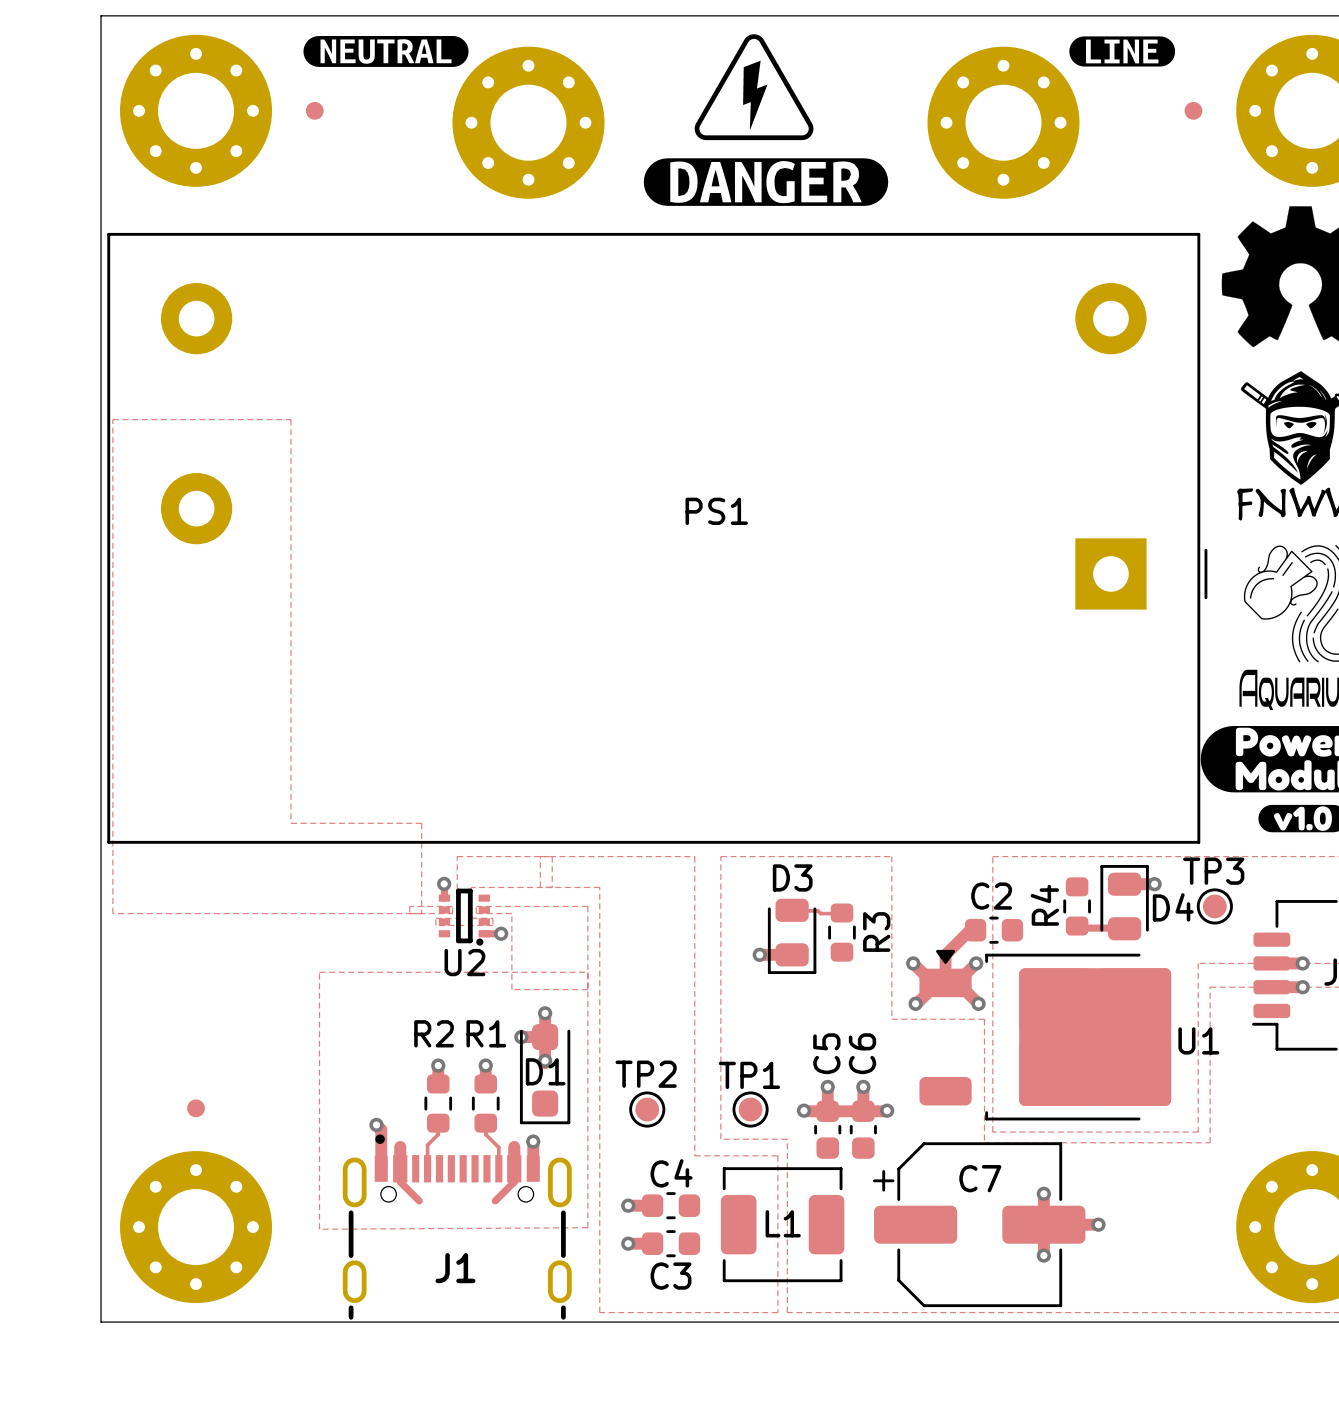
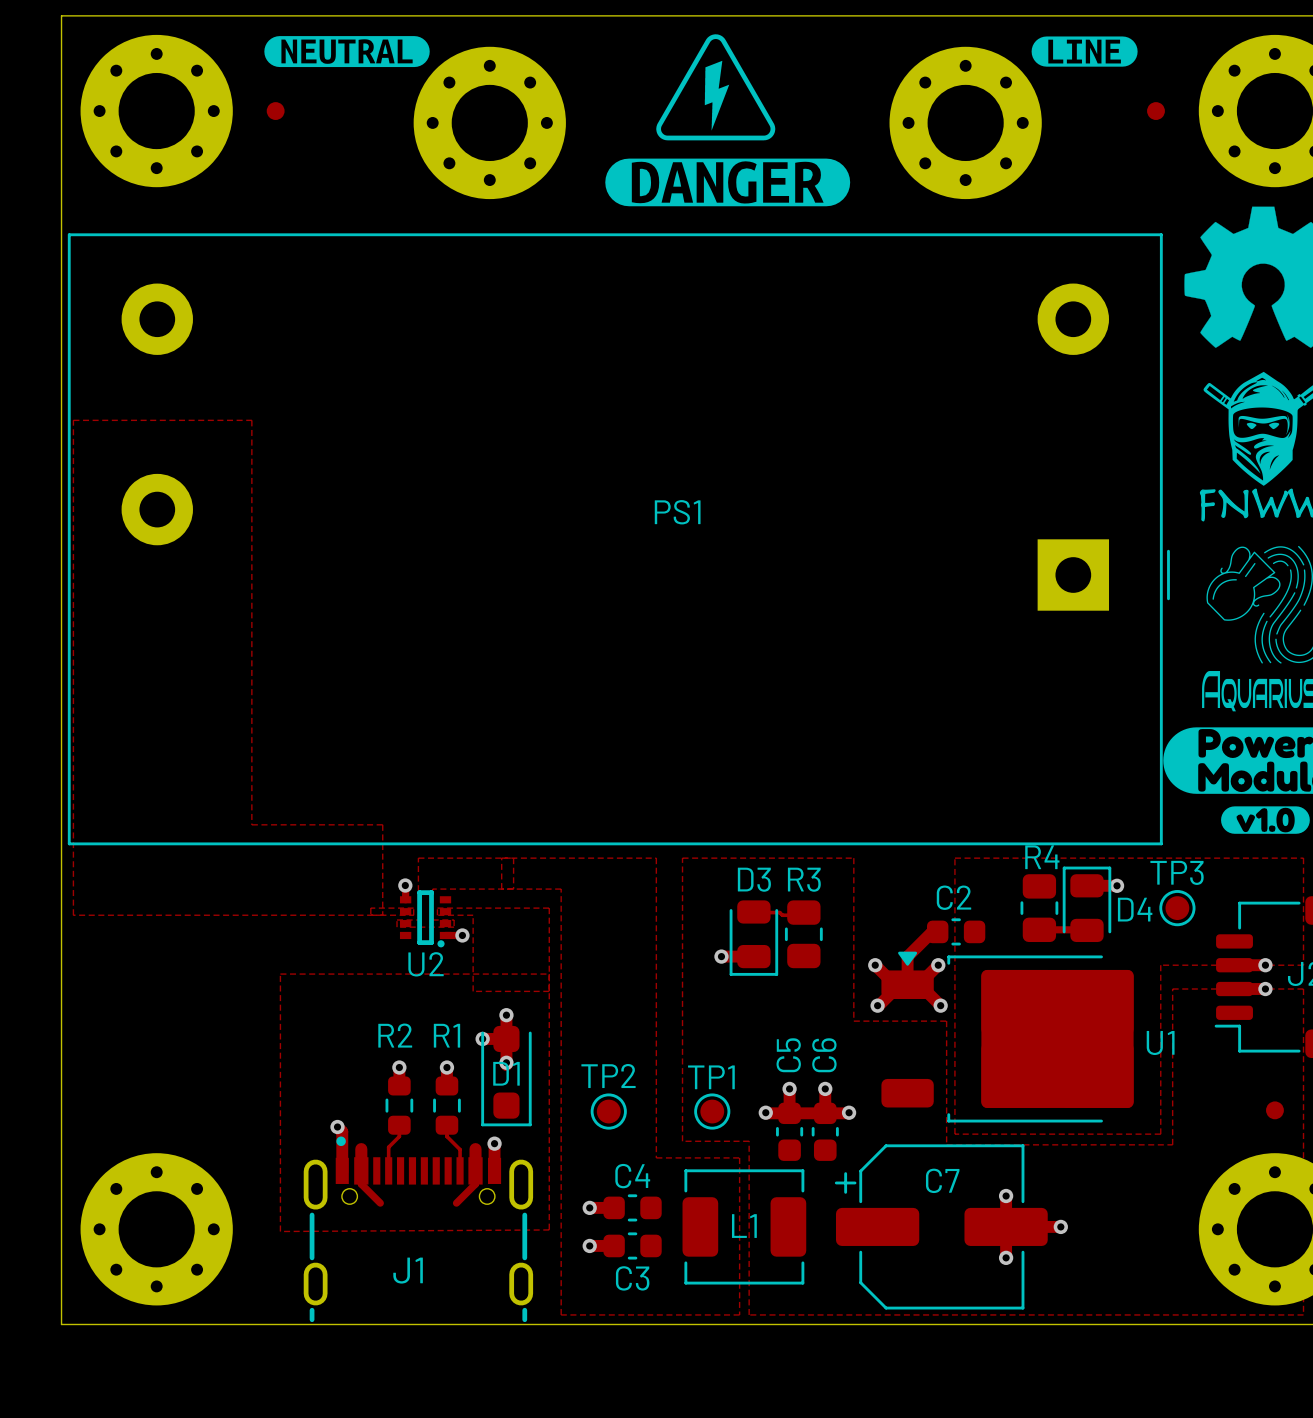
R4 footprint: [1063, 877, 1091, 936] -> [1020, 874, 1059, 943]
R3 footprint: [828, 903, 856, 962] -> [784, 900, 823, 969]
R4 name rotation: 0° (1044, 905) -> 90° clockwise (1042, 857)
R4 name position: R4 (1044, 905) -> R4 (1042, 857)
R3 name rotation: 0° (876, 932) -> 90° clockwise (804, 879)
R3 name position: R3 (876, 932) -> R3 (804, 879)
part: (196, 1108) -> none
part: none -> (1274, 1110)

